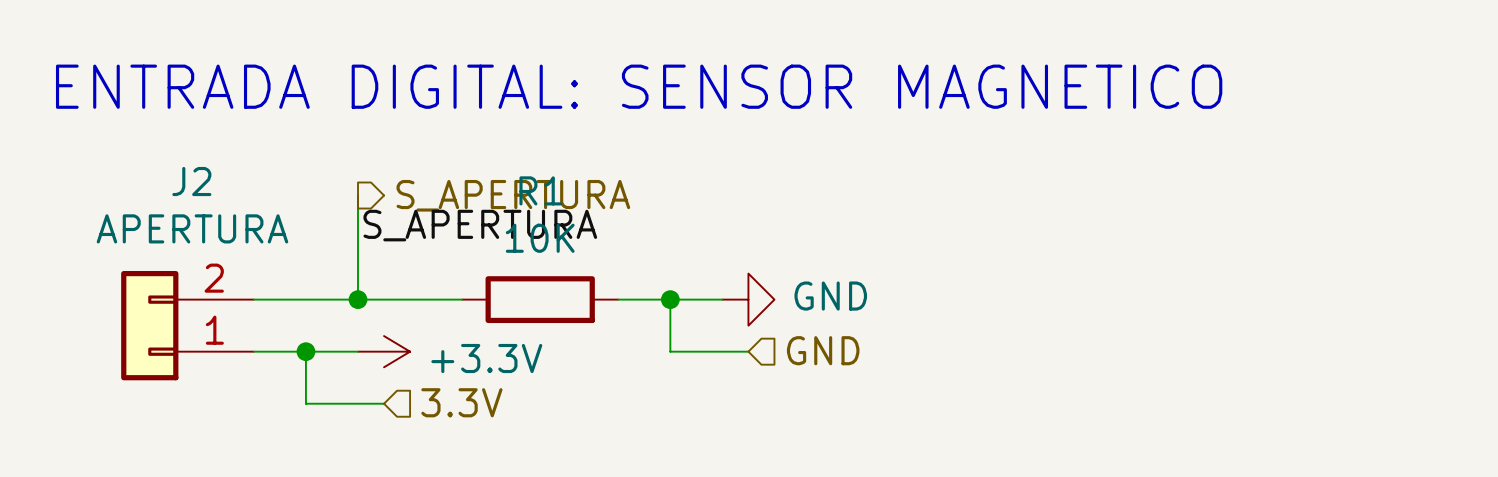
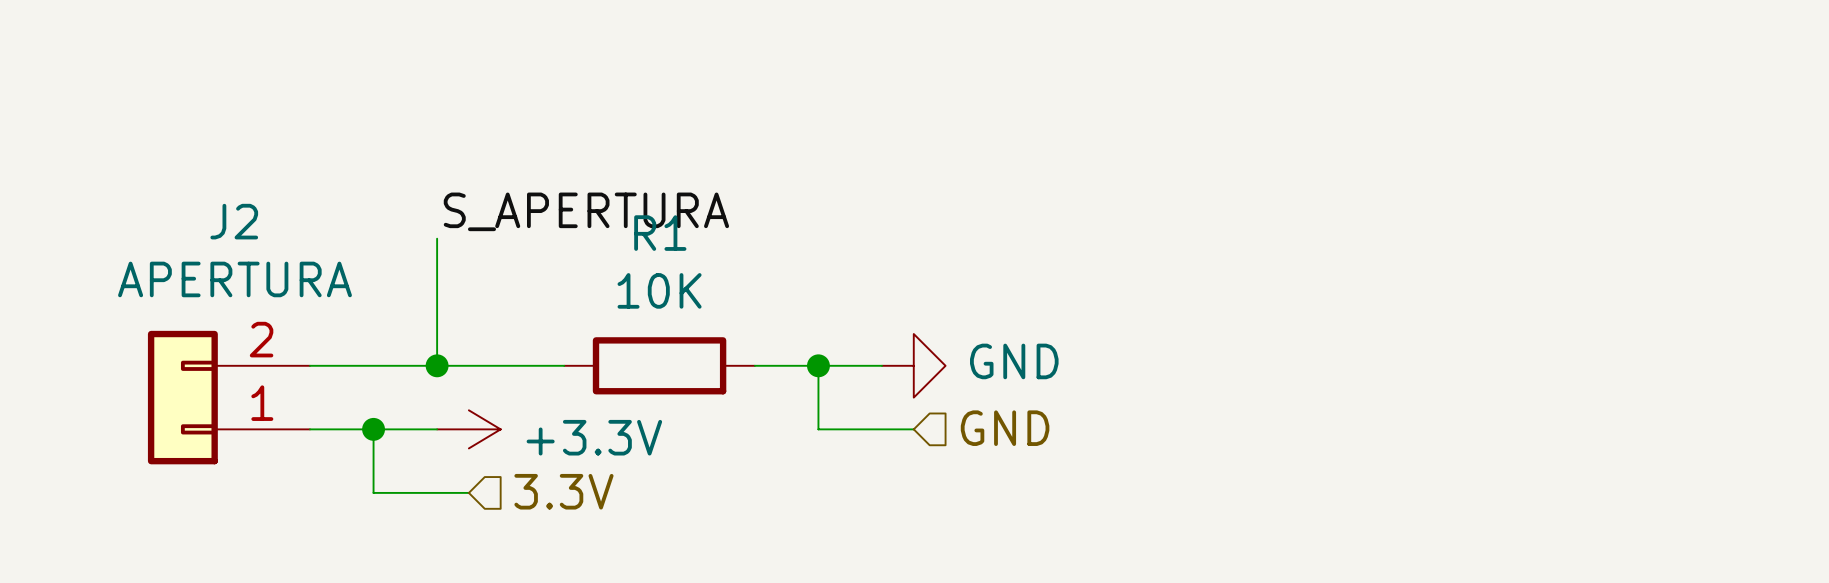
text: ENTRADA DIGITAL: SENSOR MAGNETICO (639, 86) -> none
hierarchical label: S_APERTURA (513, 195) -> none
label position: S_APERTURA (480, 225) -> S_APERTURA (586, 211)

